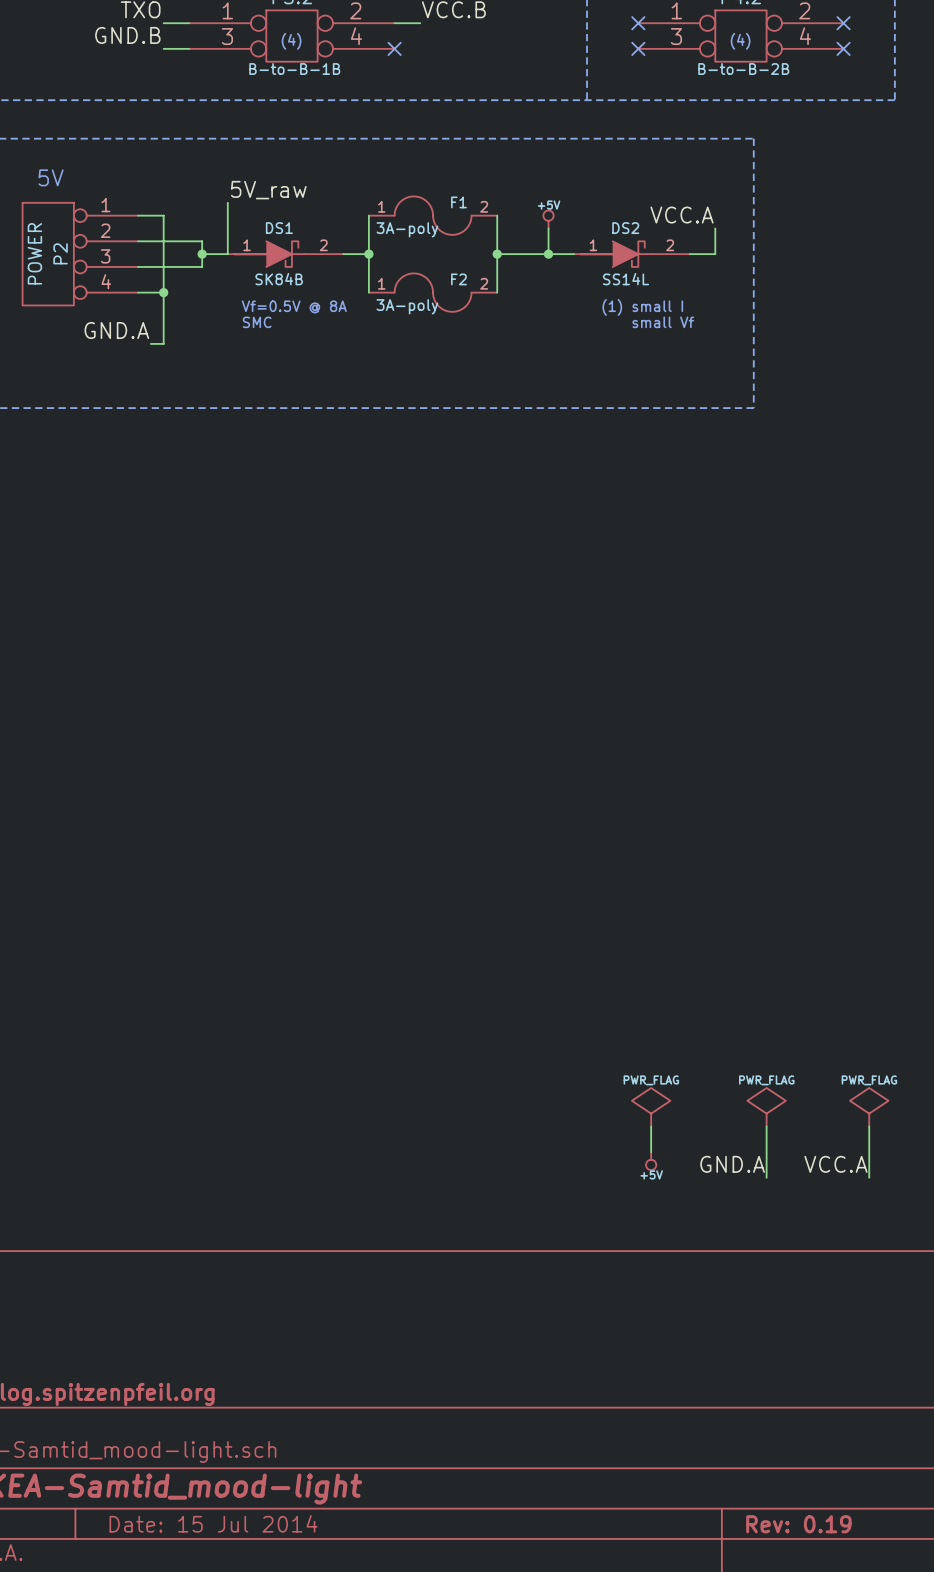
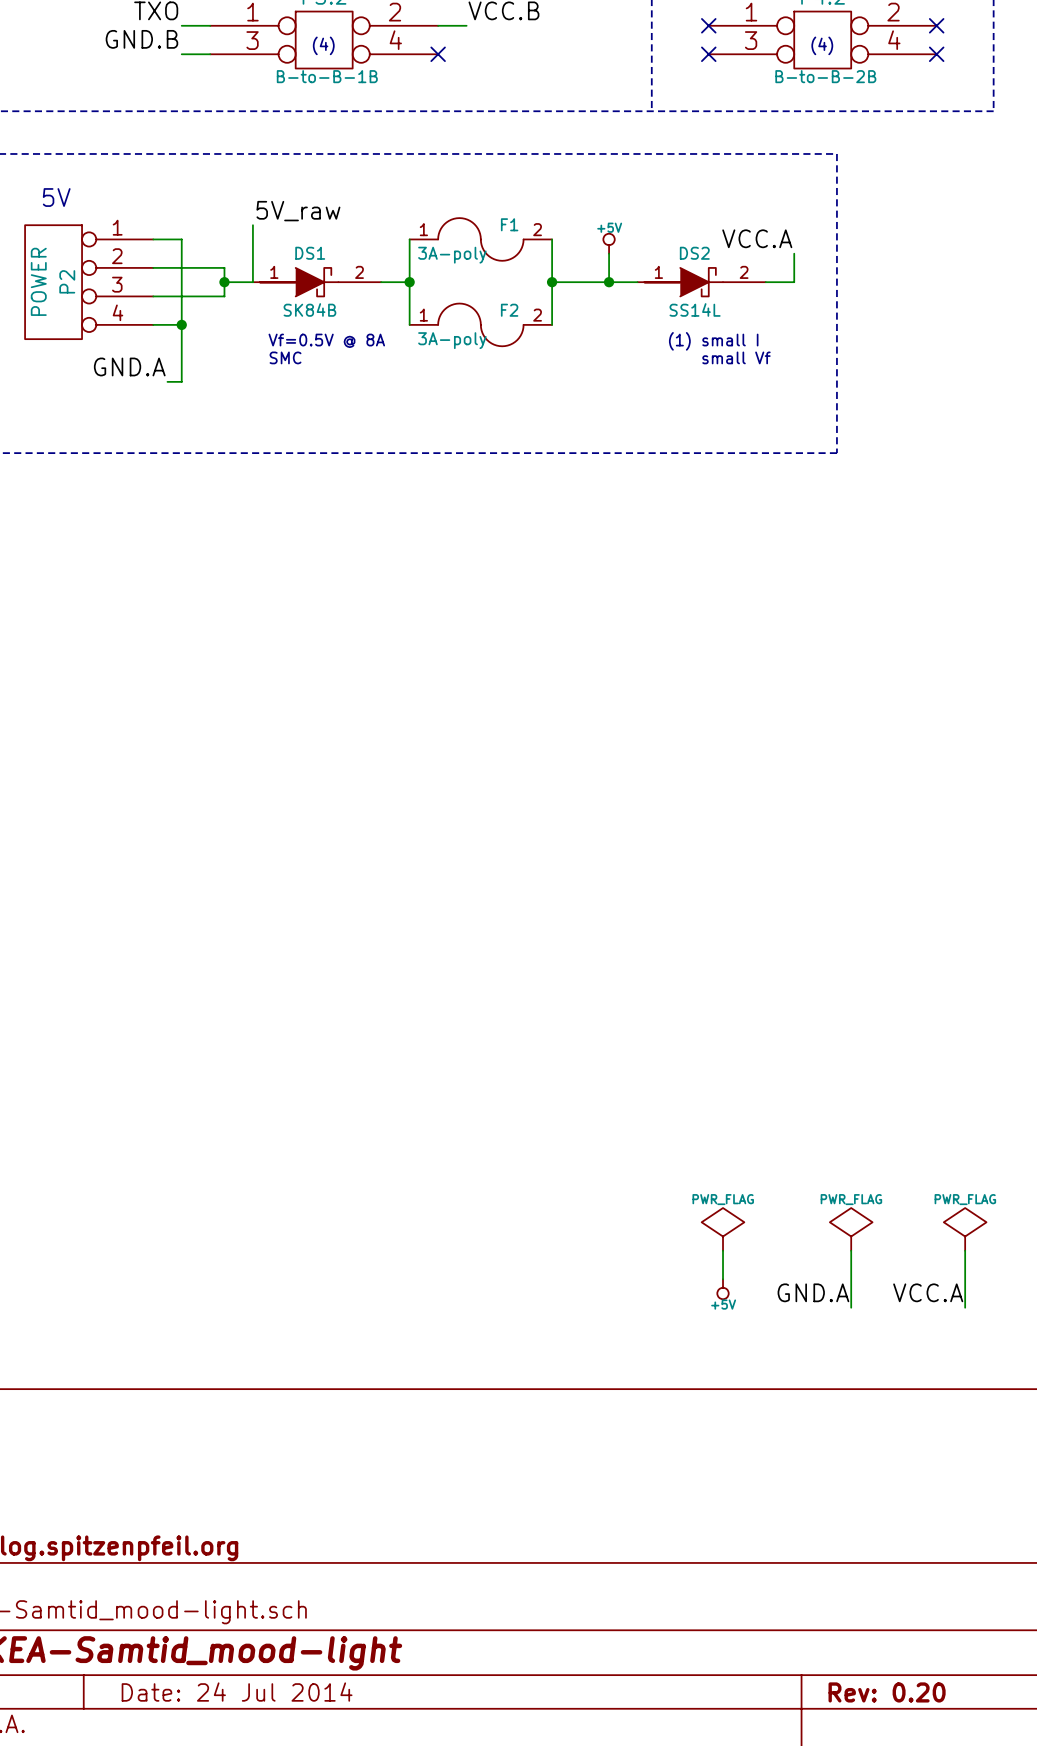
title block: Date: 15 Jul 2014 (213, 1523) -> Date: 24 Jul 2014 (237, 1692)
title block: Rev: 0.19 (798, 1524) -> Rev: 0.20 (887, 1692)

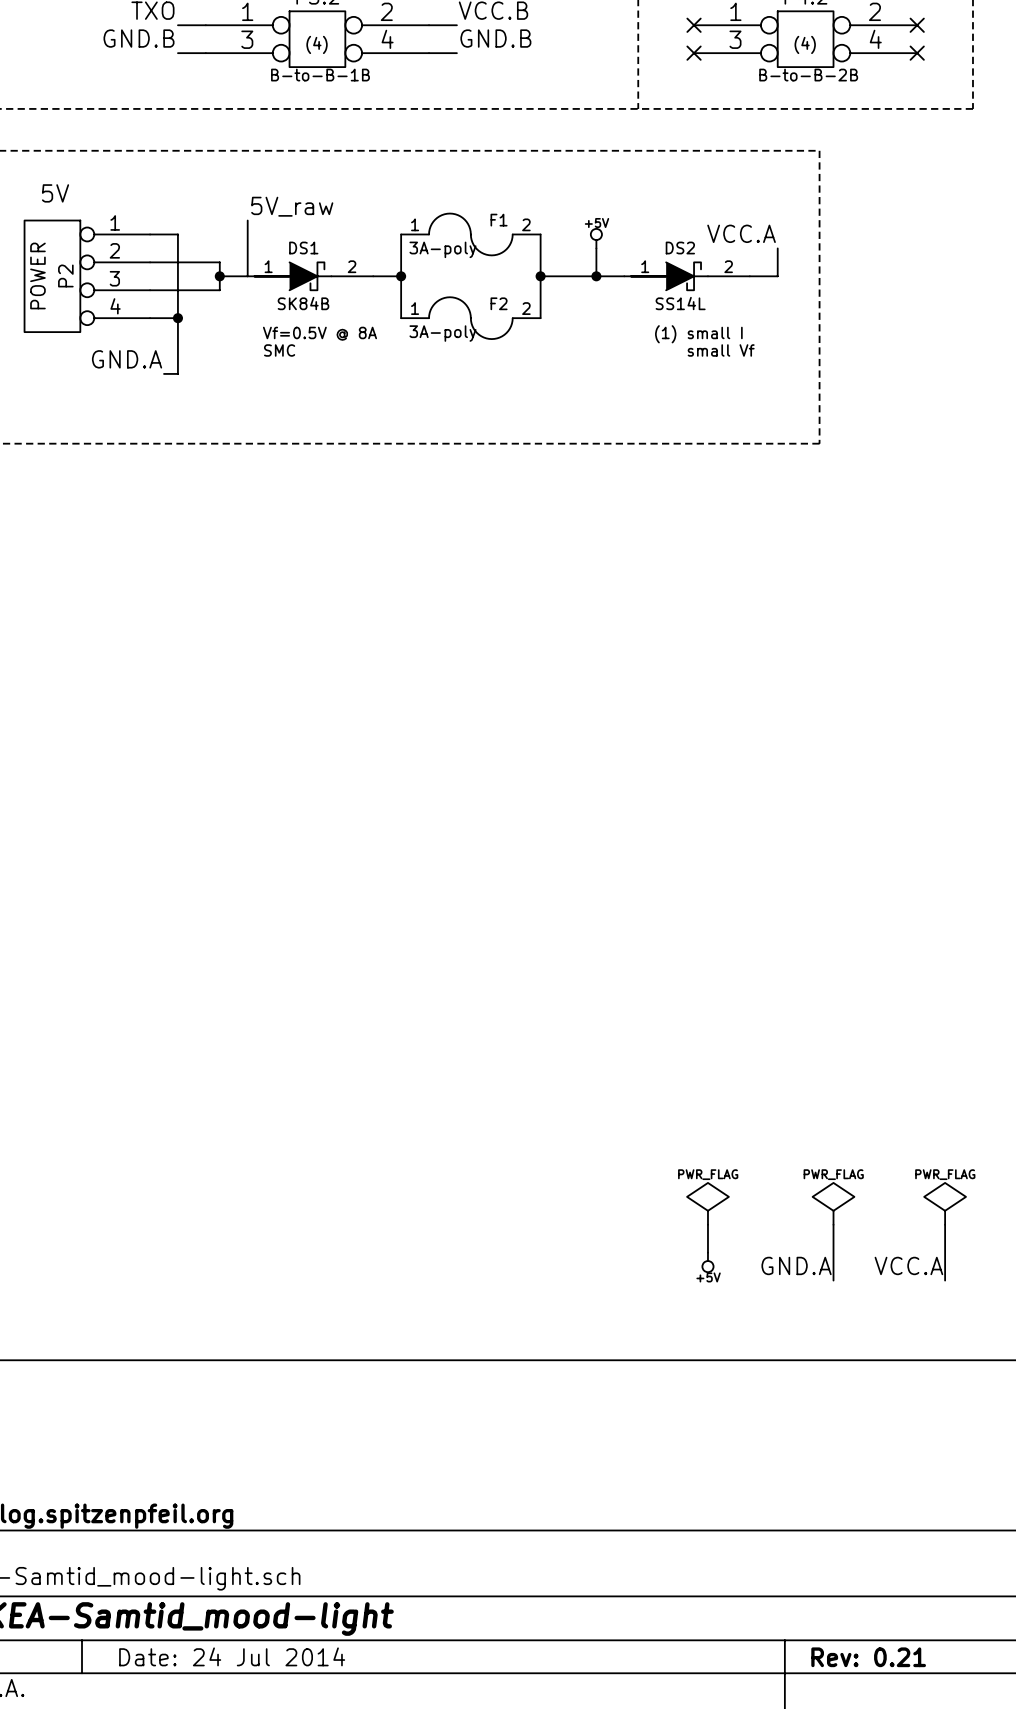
label: none -> GND.B (495, 38)
wire: none -> (429, 53) (456, 53)
no-connect mark: (438, 54) -> none
title block: Rev: 0.20 (887, 1692) -> Rev: 0.21 (868, 1657)

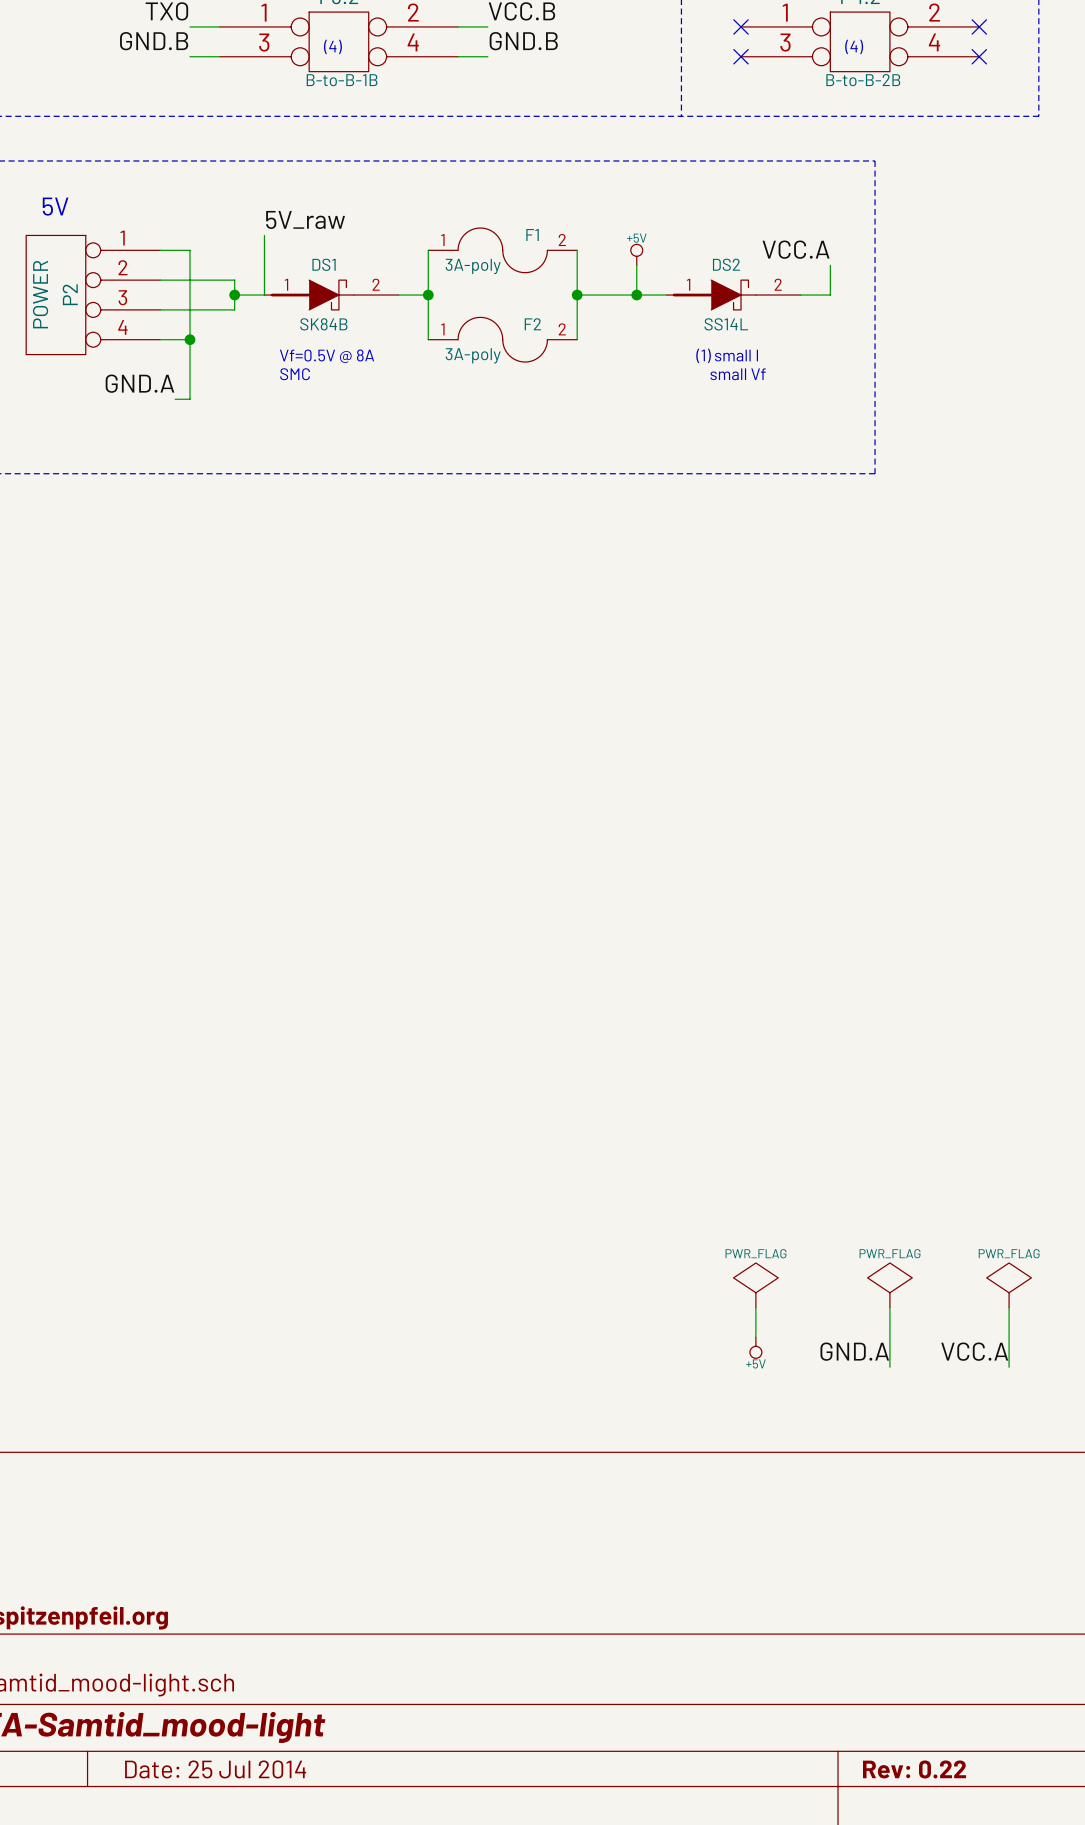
title block: Date: 24 Jul 2014 (232, 1656) -> Date: 25 Jul 2014 (215, 1769)
title block: Rev: 0.21 (868, 1657) -> Rev: 0.22 (914, 1769)

